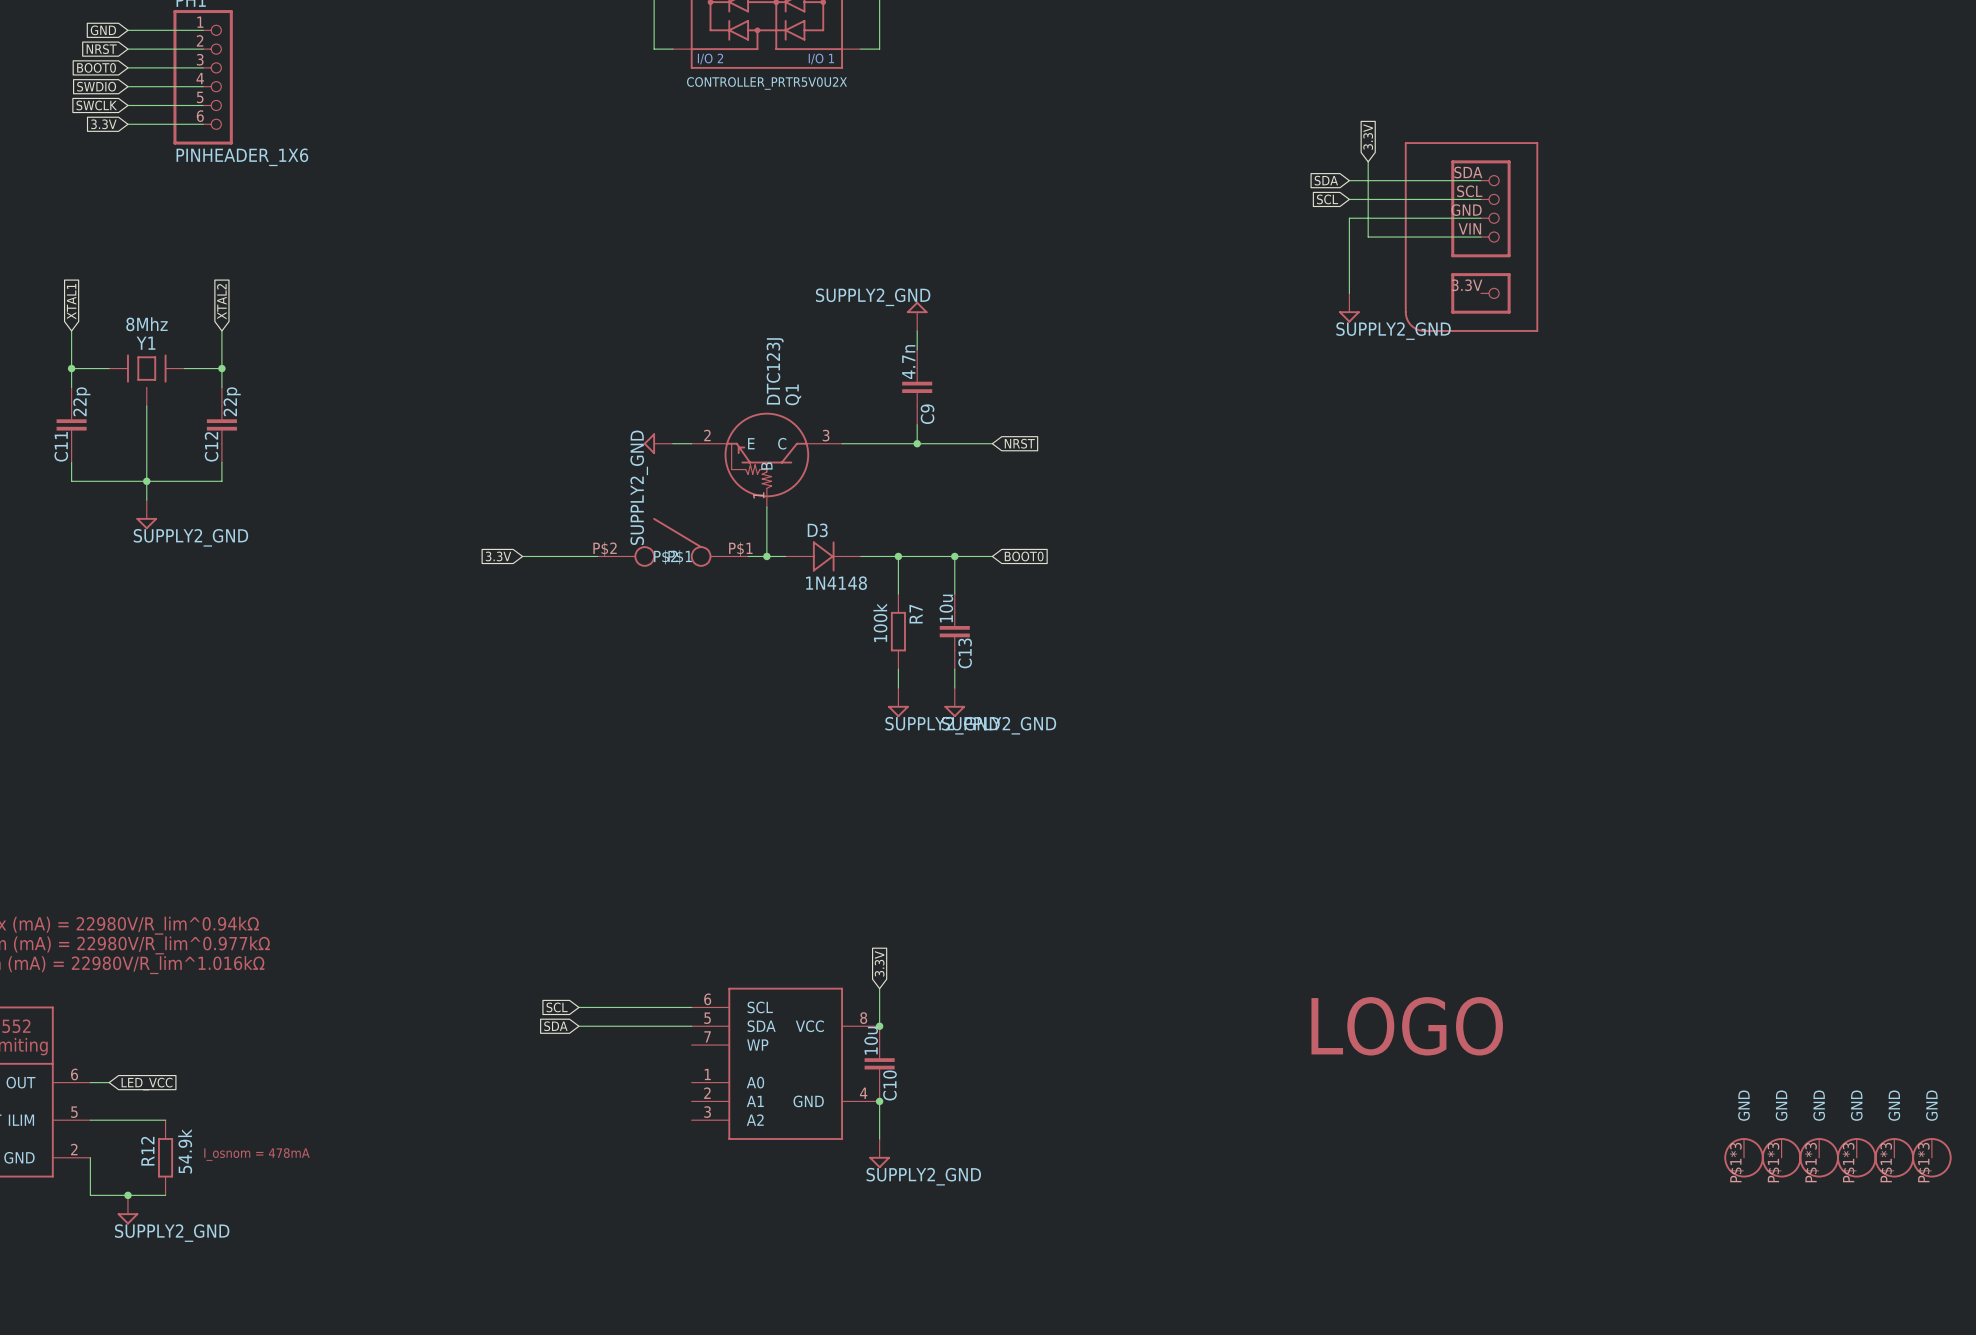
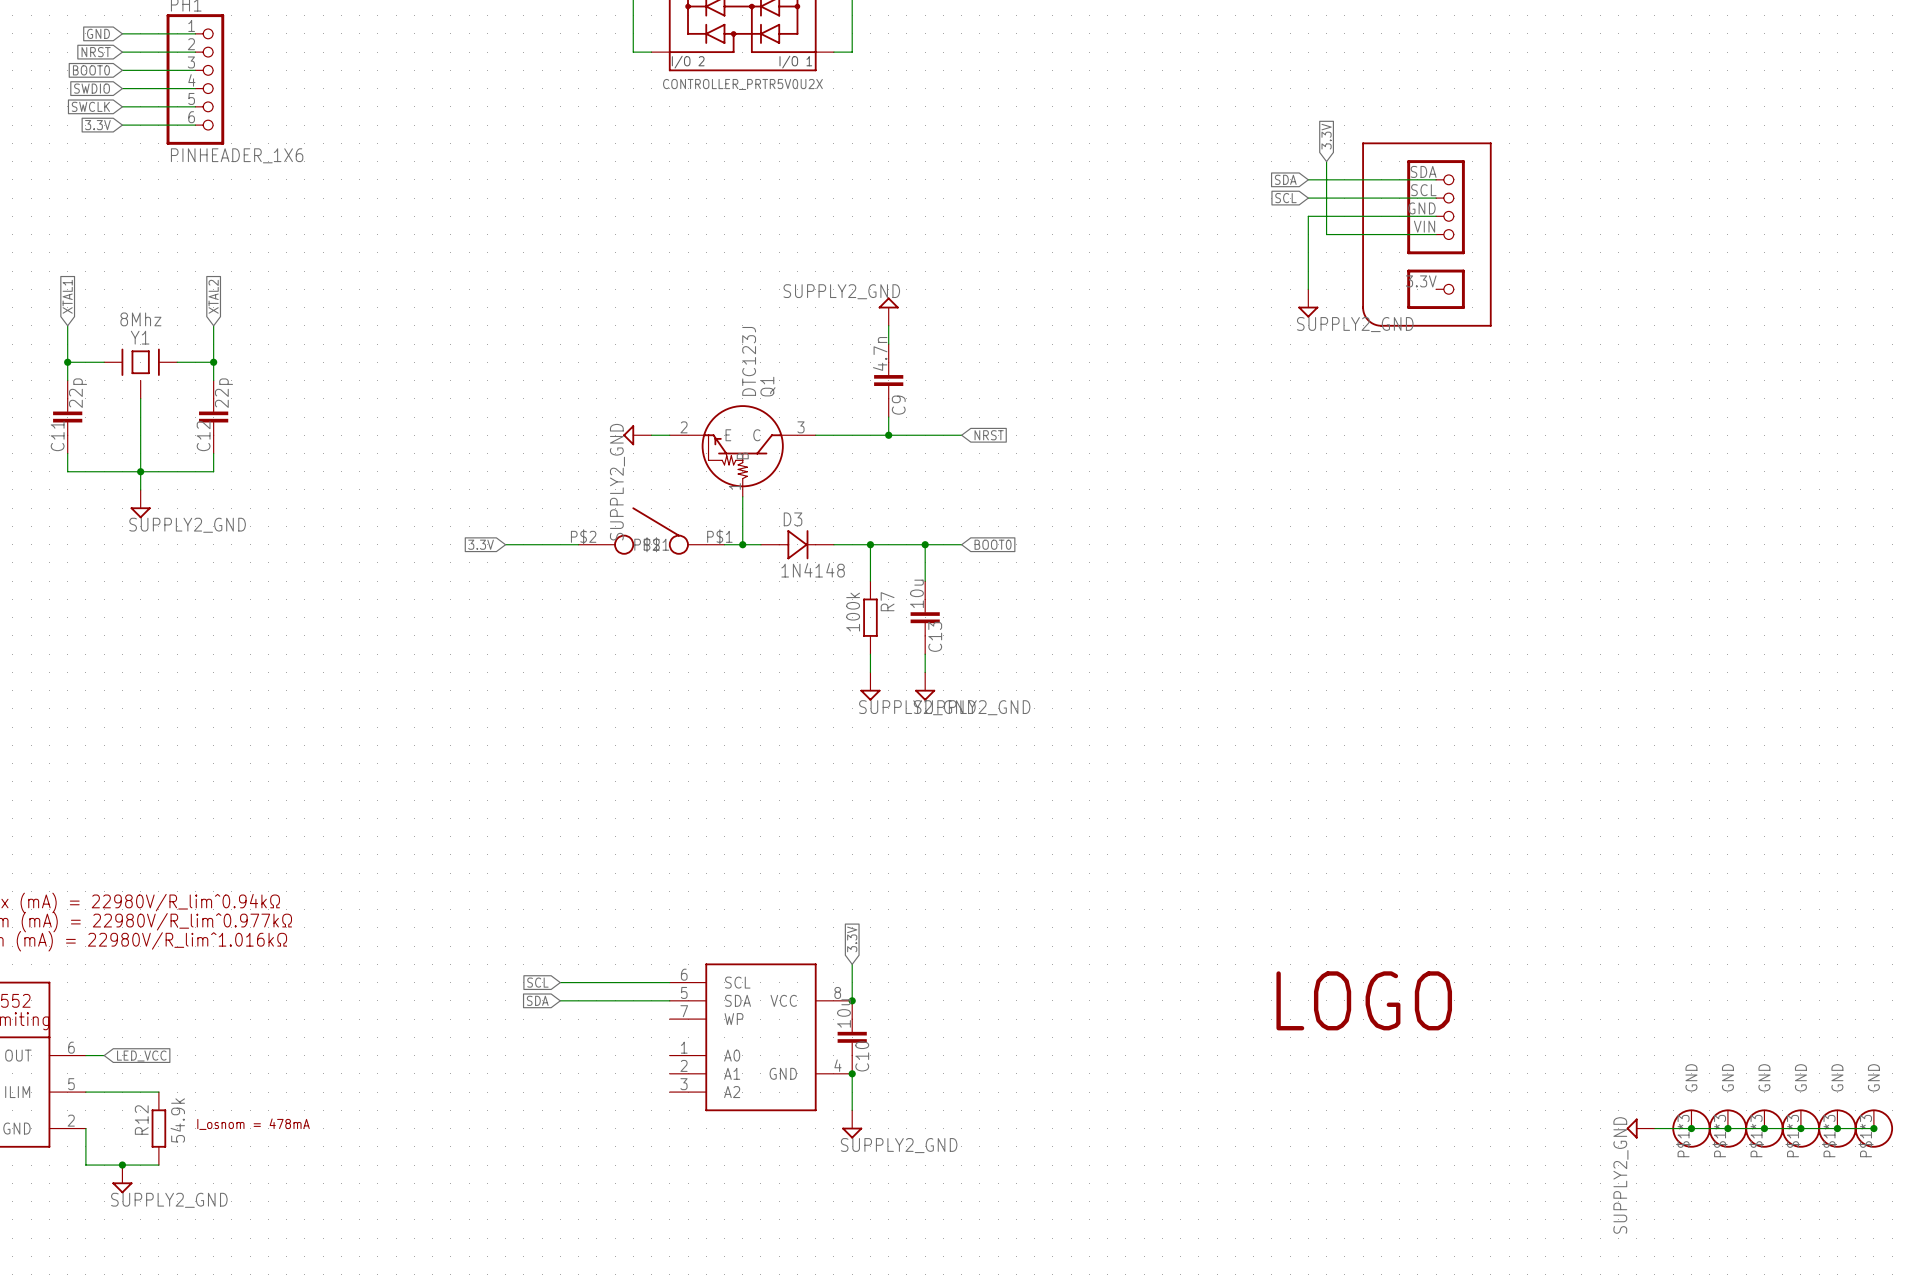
power symbol: none -> SUPPLY2_GND (1640, 1128)
wire: none -> (1654, 1128) (1873, 1128)
junction: none -> (1691, 1128)
junction: none -> (1727, 1128)
junction: none -> (1764, 1128)
junction: none -> (1800, 1128)
junction: none -> (1837, 1128)
junction: none -> (1873, 1128)

